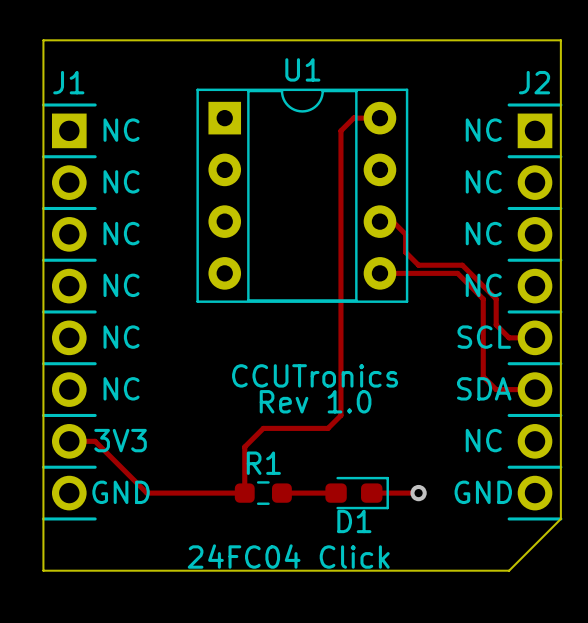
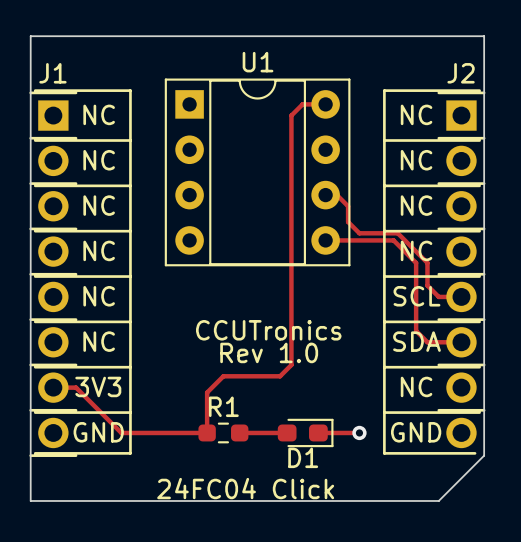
line: none -> (35, 90) (130, 90) (130, 453) (35, 453)
line: none -> (479, 90) (384, 90) (384, 453) (475, 453)
line: none -> (35, 140) (130, 140)
line: none -> (384, 140) (479, 140)
line: none -> (35, 185) (130, 185)
line: none -> (384, 185) (479, 185)
line: none -> (35, 231) (130, 231)
line: none -> (384, 231) (479, 231)
line: none -> (35, 276) (130, 276)
line: none -> (384, 276) (479, 276)
line: none -> (35, 321) (130, 321)
line: none -> (384, 321) (479, 321)
line: none -> (35, 367) (130, 367)
line: none -> (384, 367) (479, 367)
line: none -> (35, 412) (130, 412)
line: none -> (384, 412) (479, 412)
line: (509, 518) (560, 518) -> none

